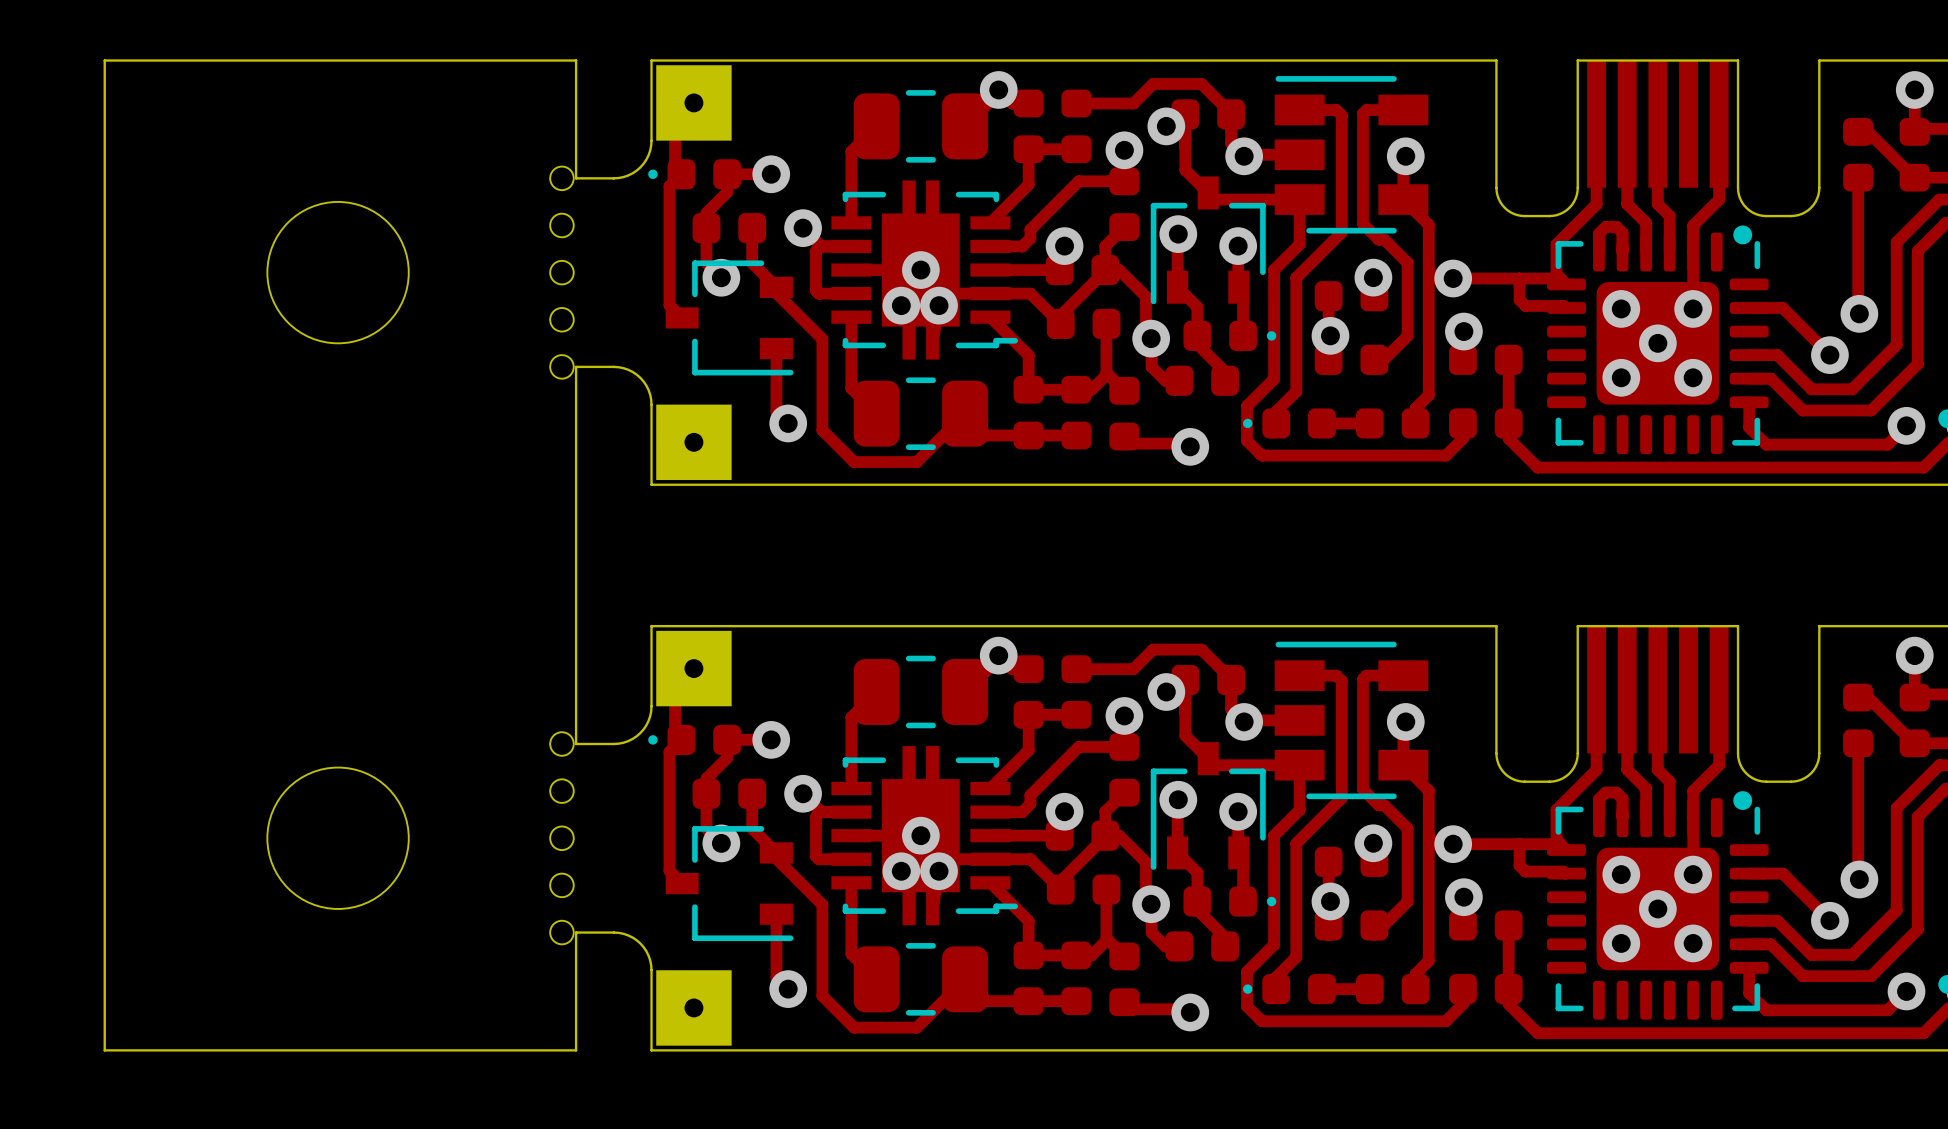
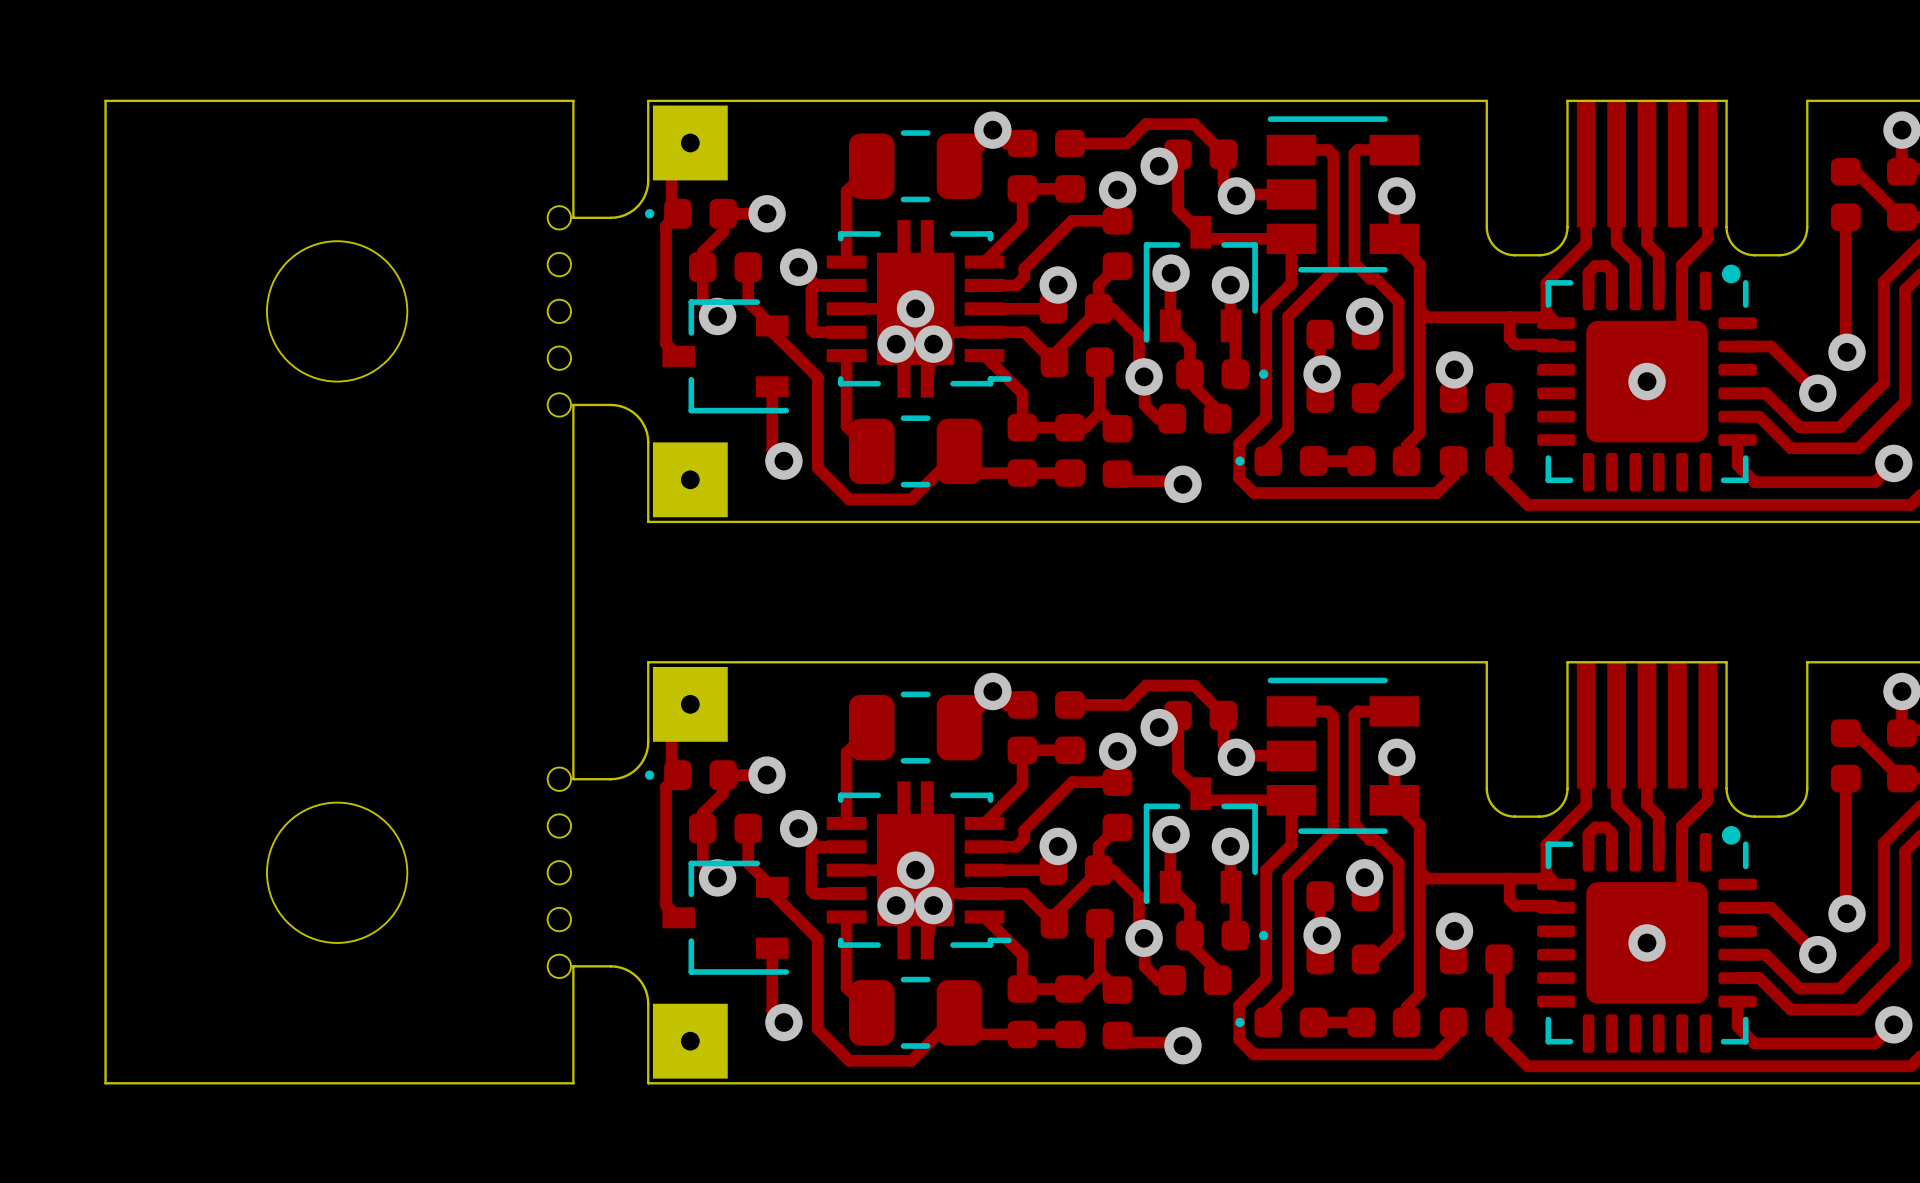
via: (1453, 278) -> none
via: (1621, 308) -> none
via: (1693, 308) -> none
via: (1621, 377) -> none
via: (1693, 377) -> none
via: (1453, 844) -> none
via: (1621, 874) -> none
via: (1693, 874) -> none
via: (1621, 943) -> none
via: (1693, 943) -> none

